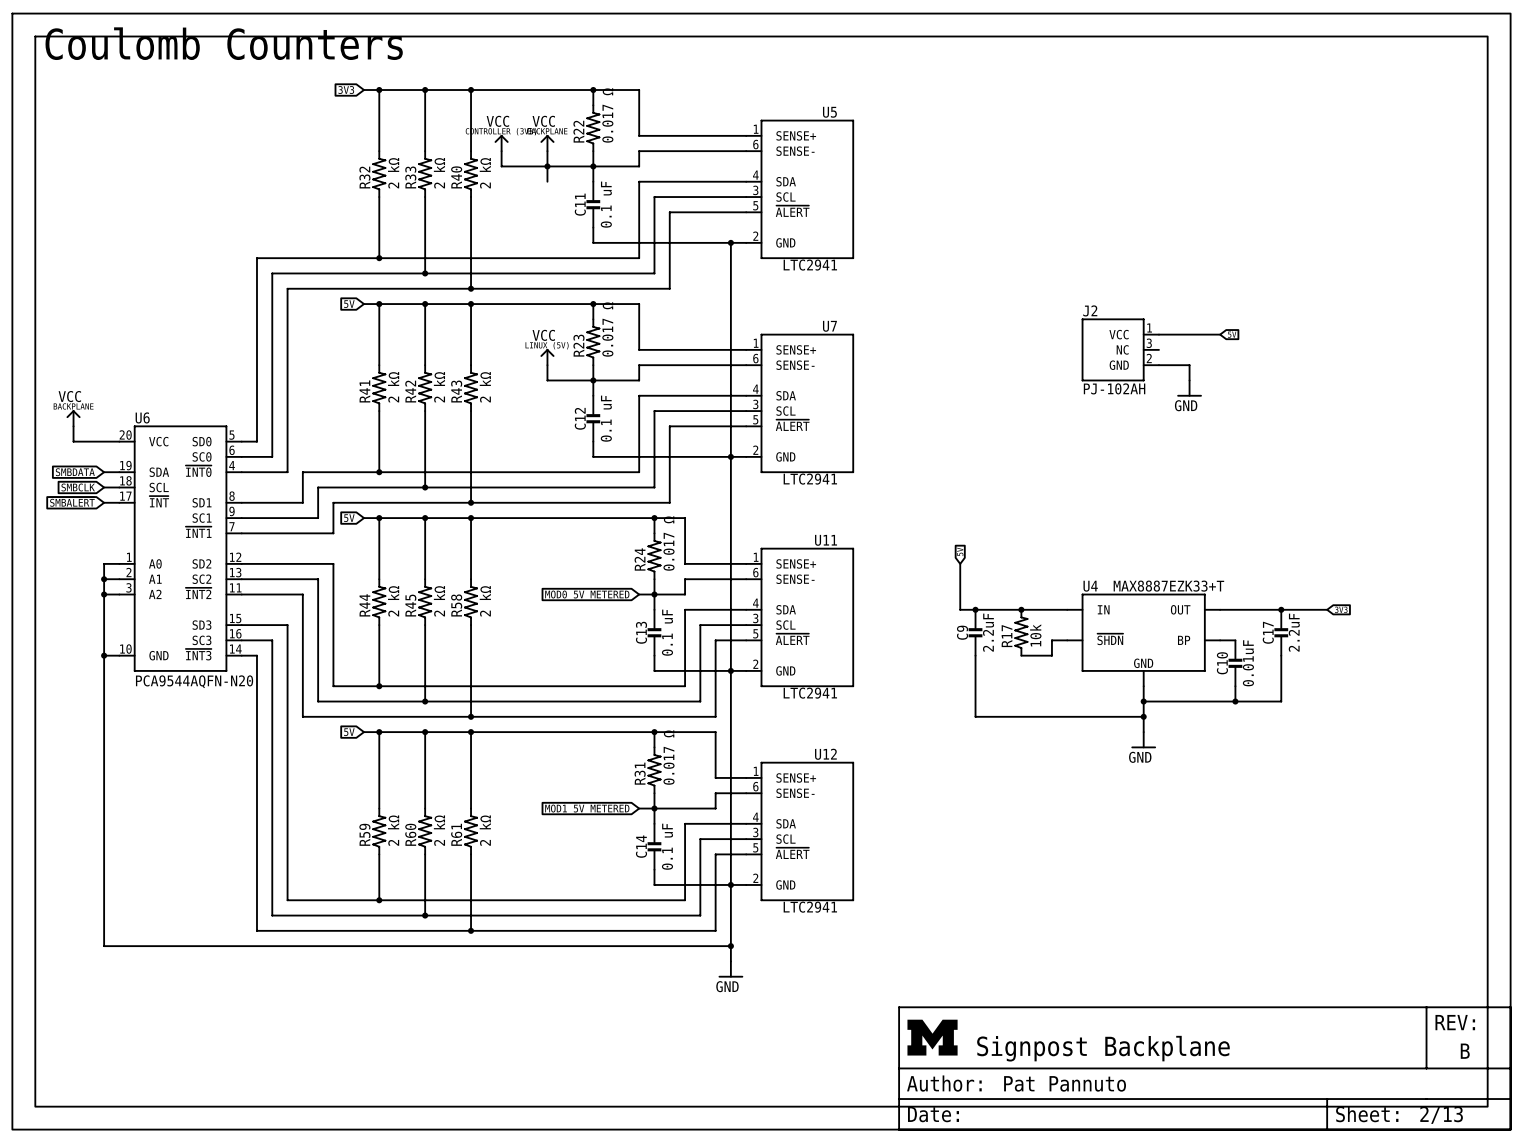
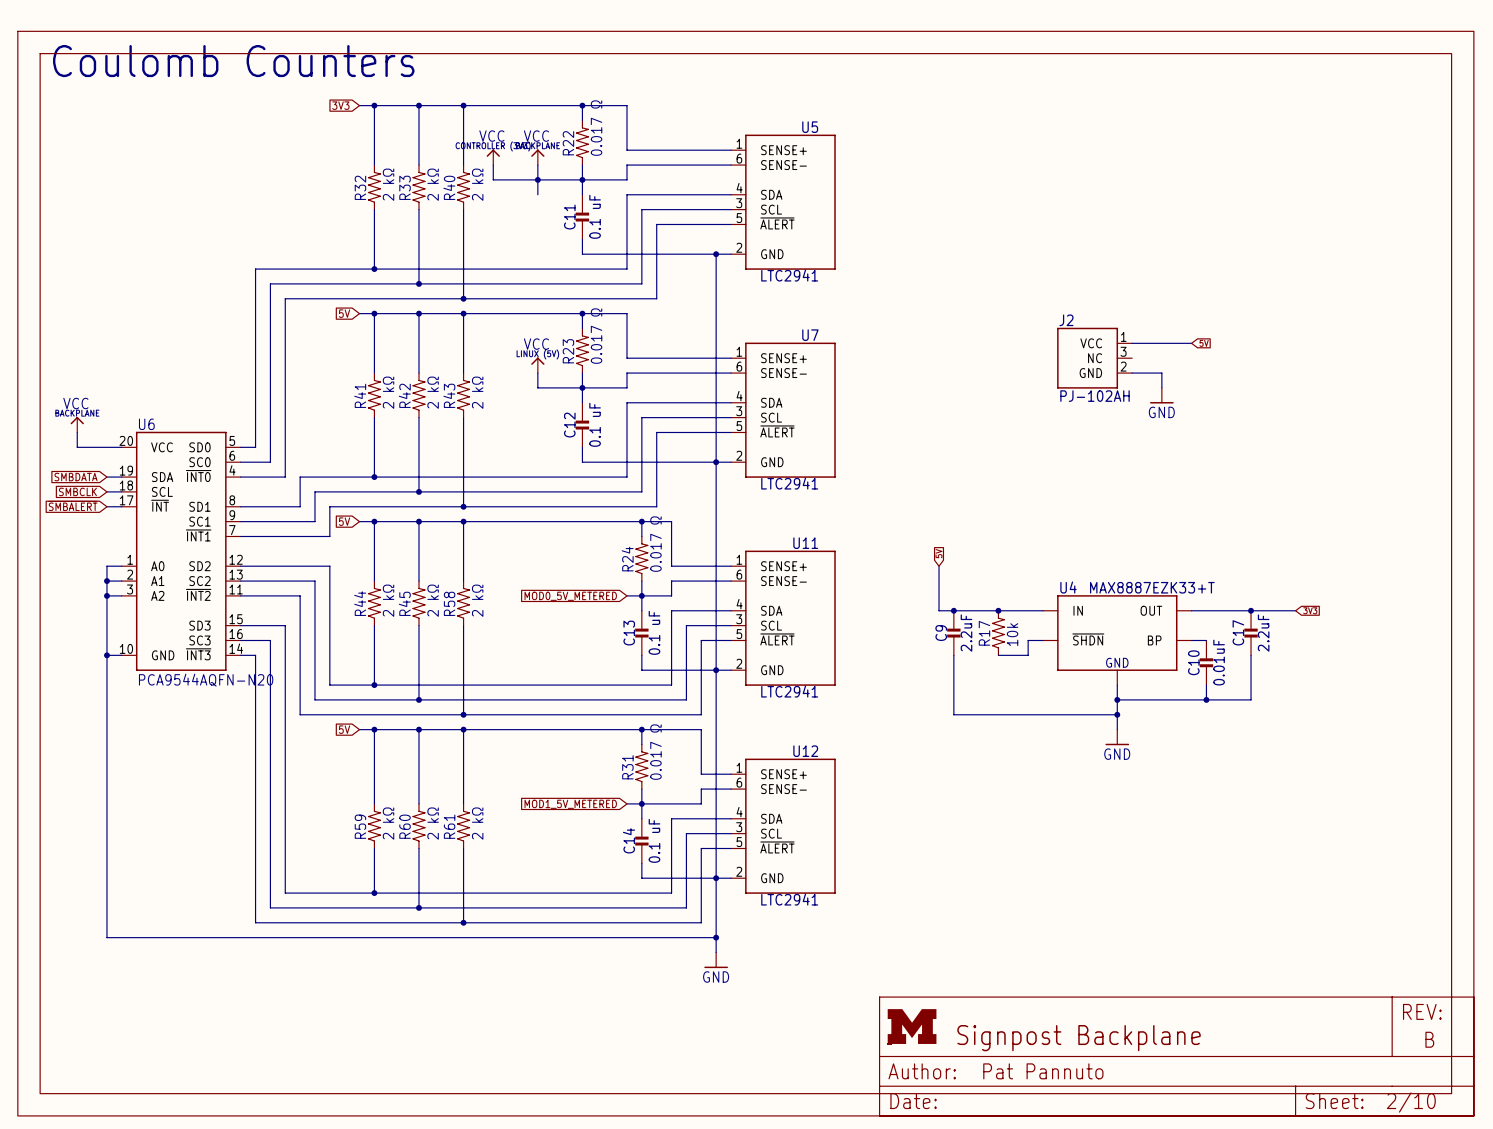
part text: 2/13 (1441, 1115) -> 2/10 (1411, 1102)

